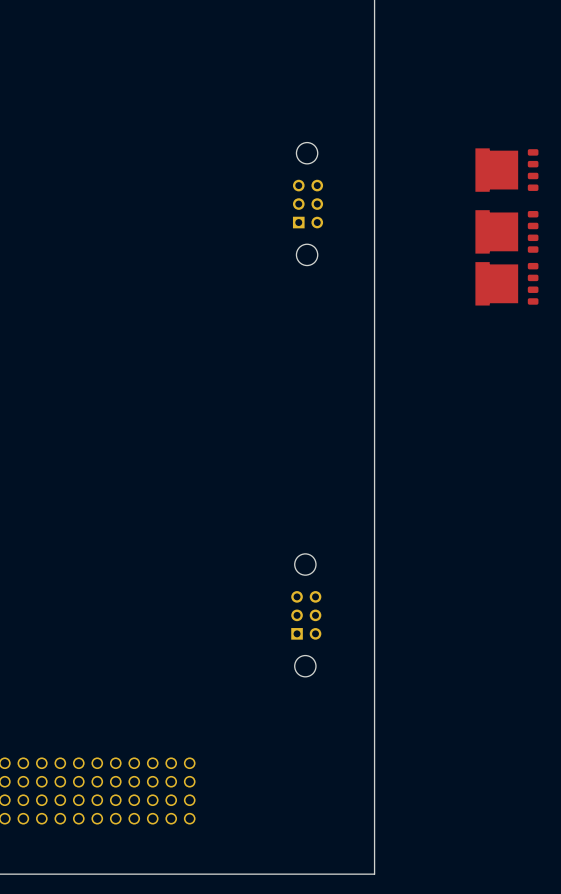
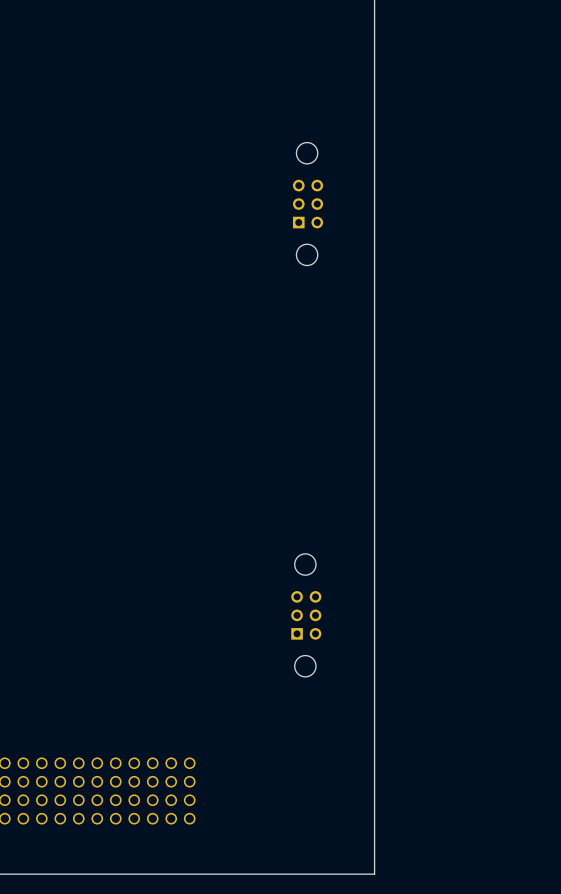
part: (506, 170) -> none
part: (506, 231) -> none
part: (506, 283) -> none

